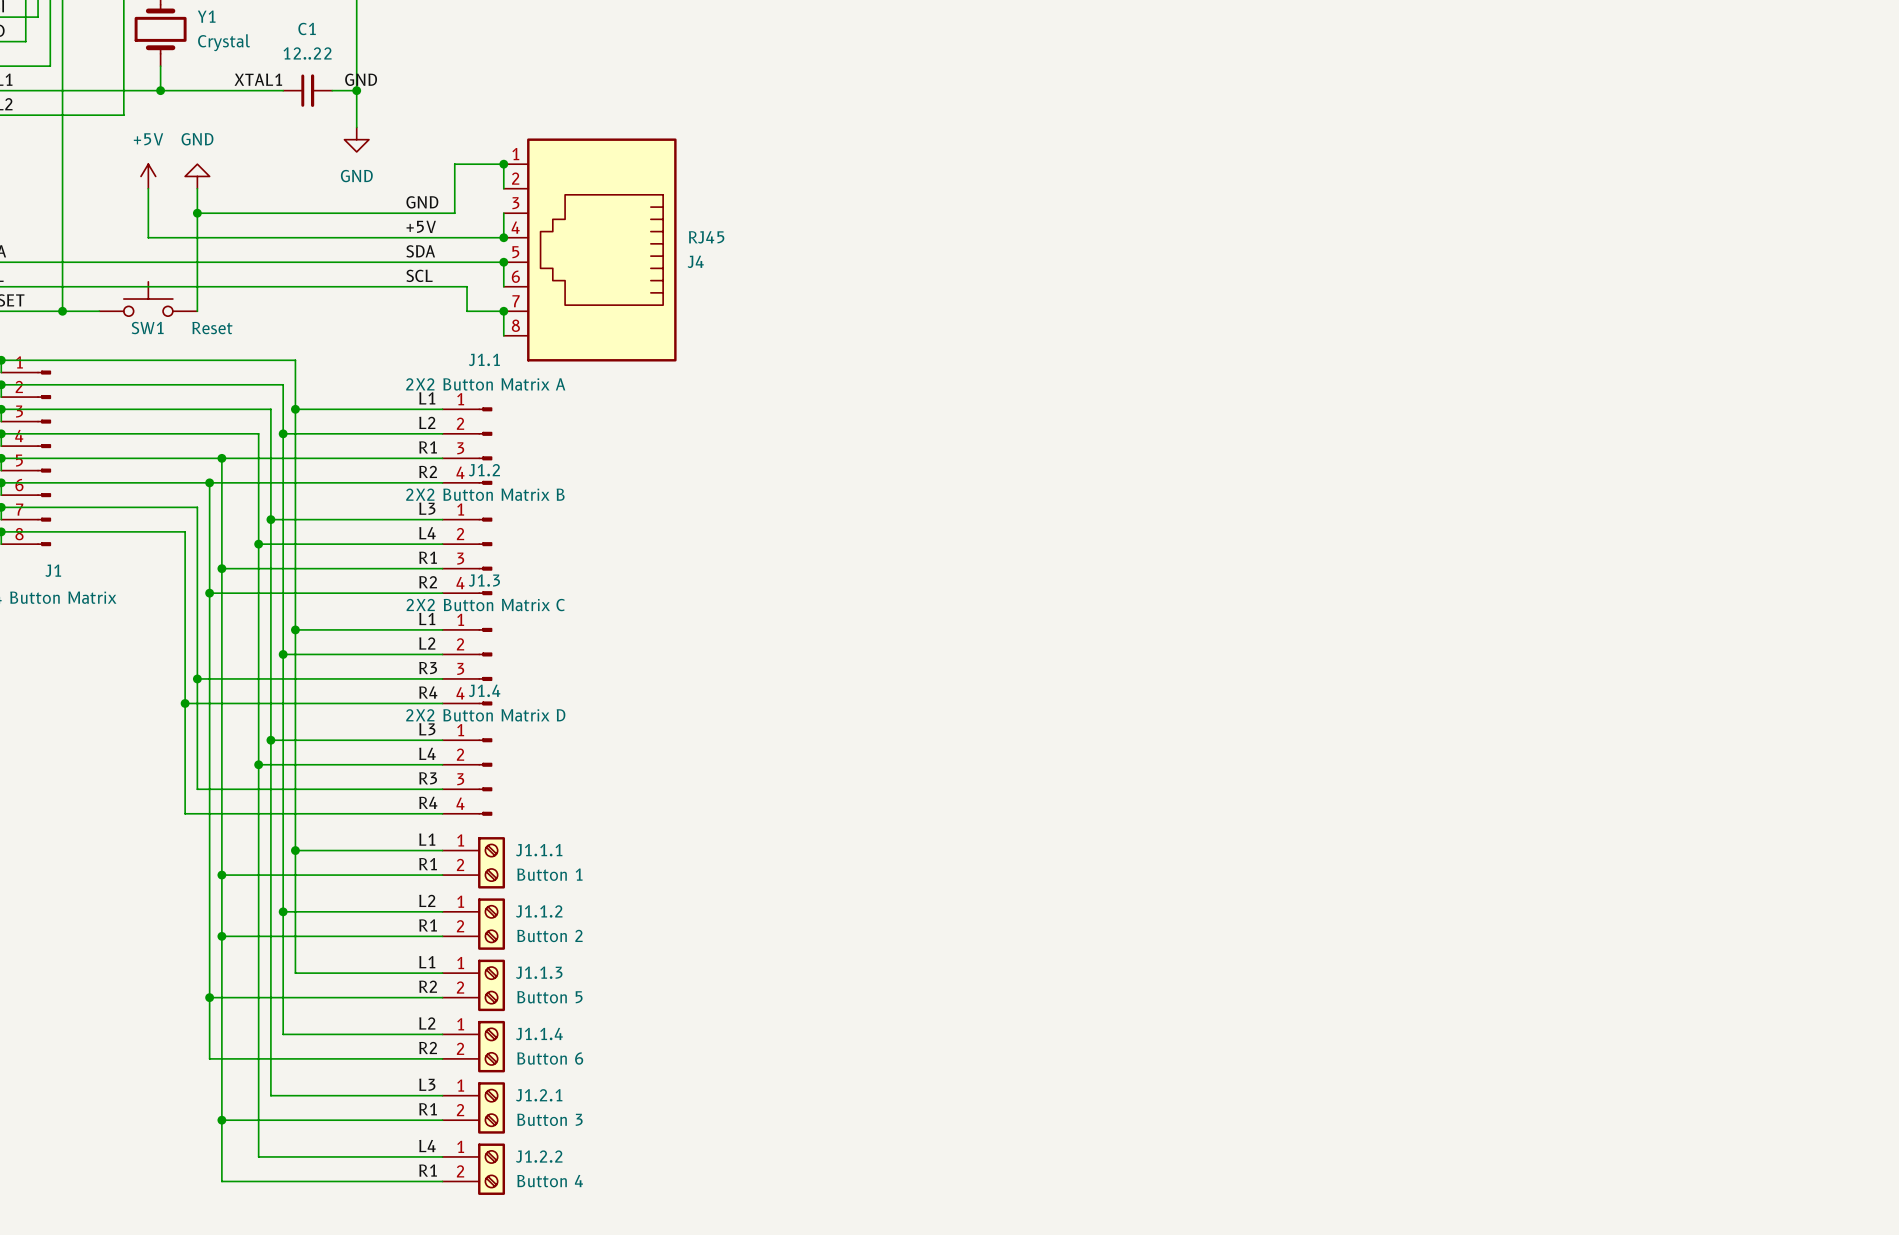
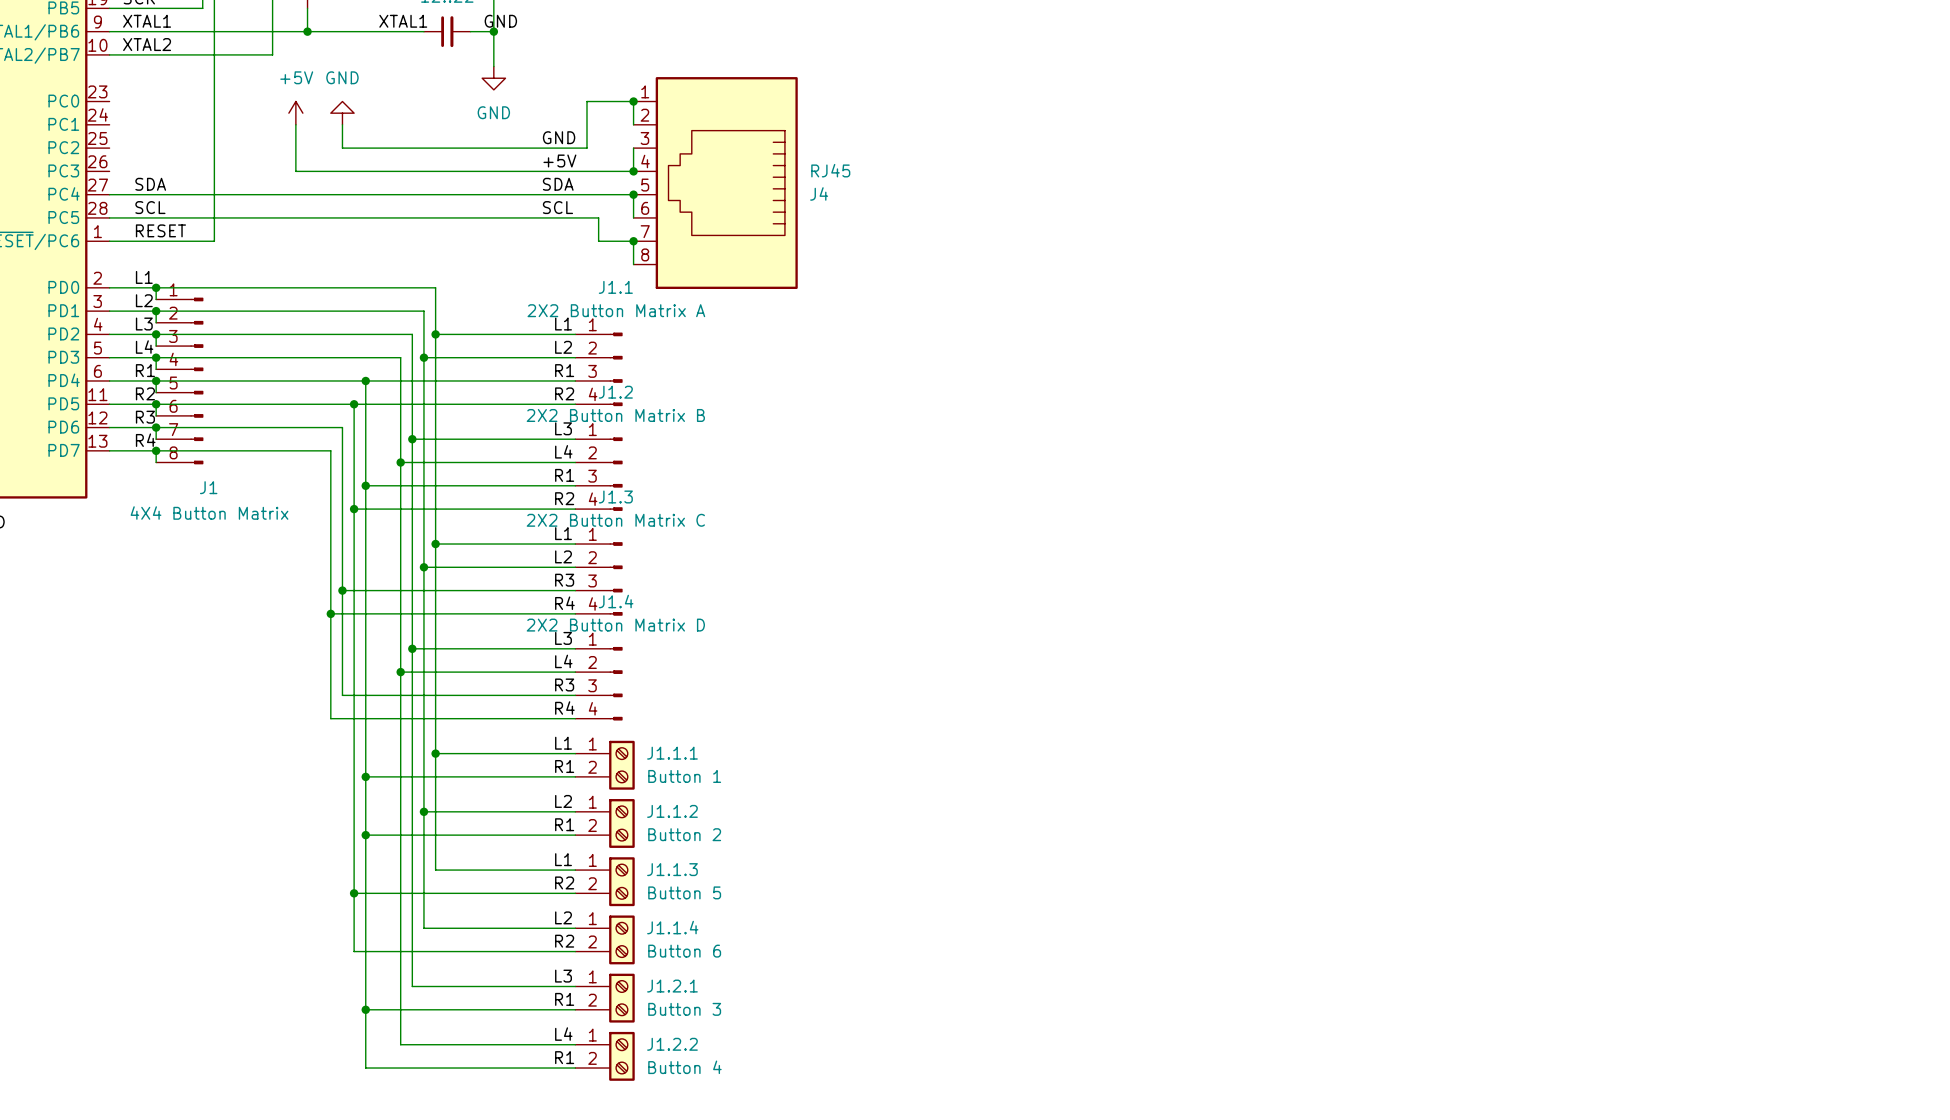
wire: (197, 213) (197, 311) -> none
junction: (197, 213) -> none
SW1: Reset (148, 299) -> none
wire: (62, 311) (99, 311) -> none
junction: (62, 311) -> none

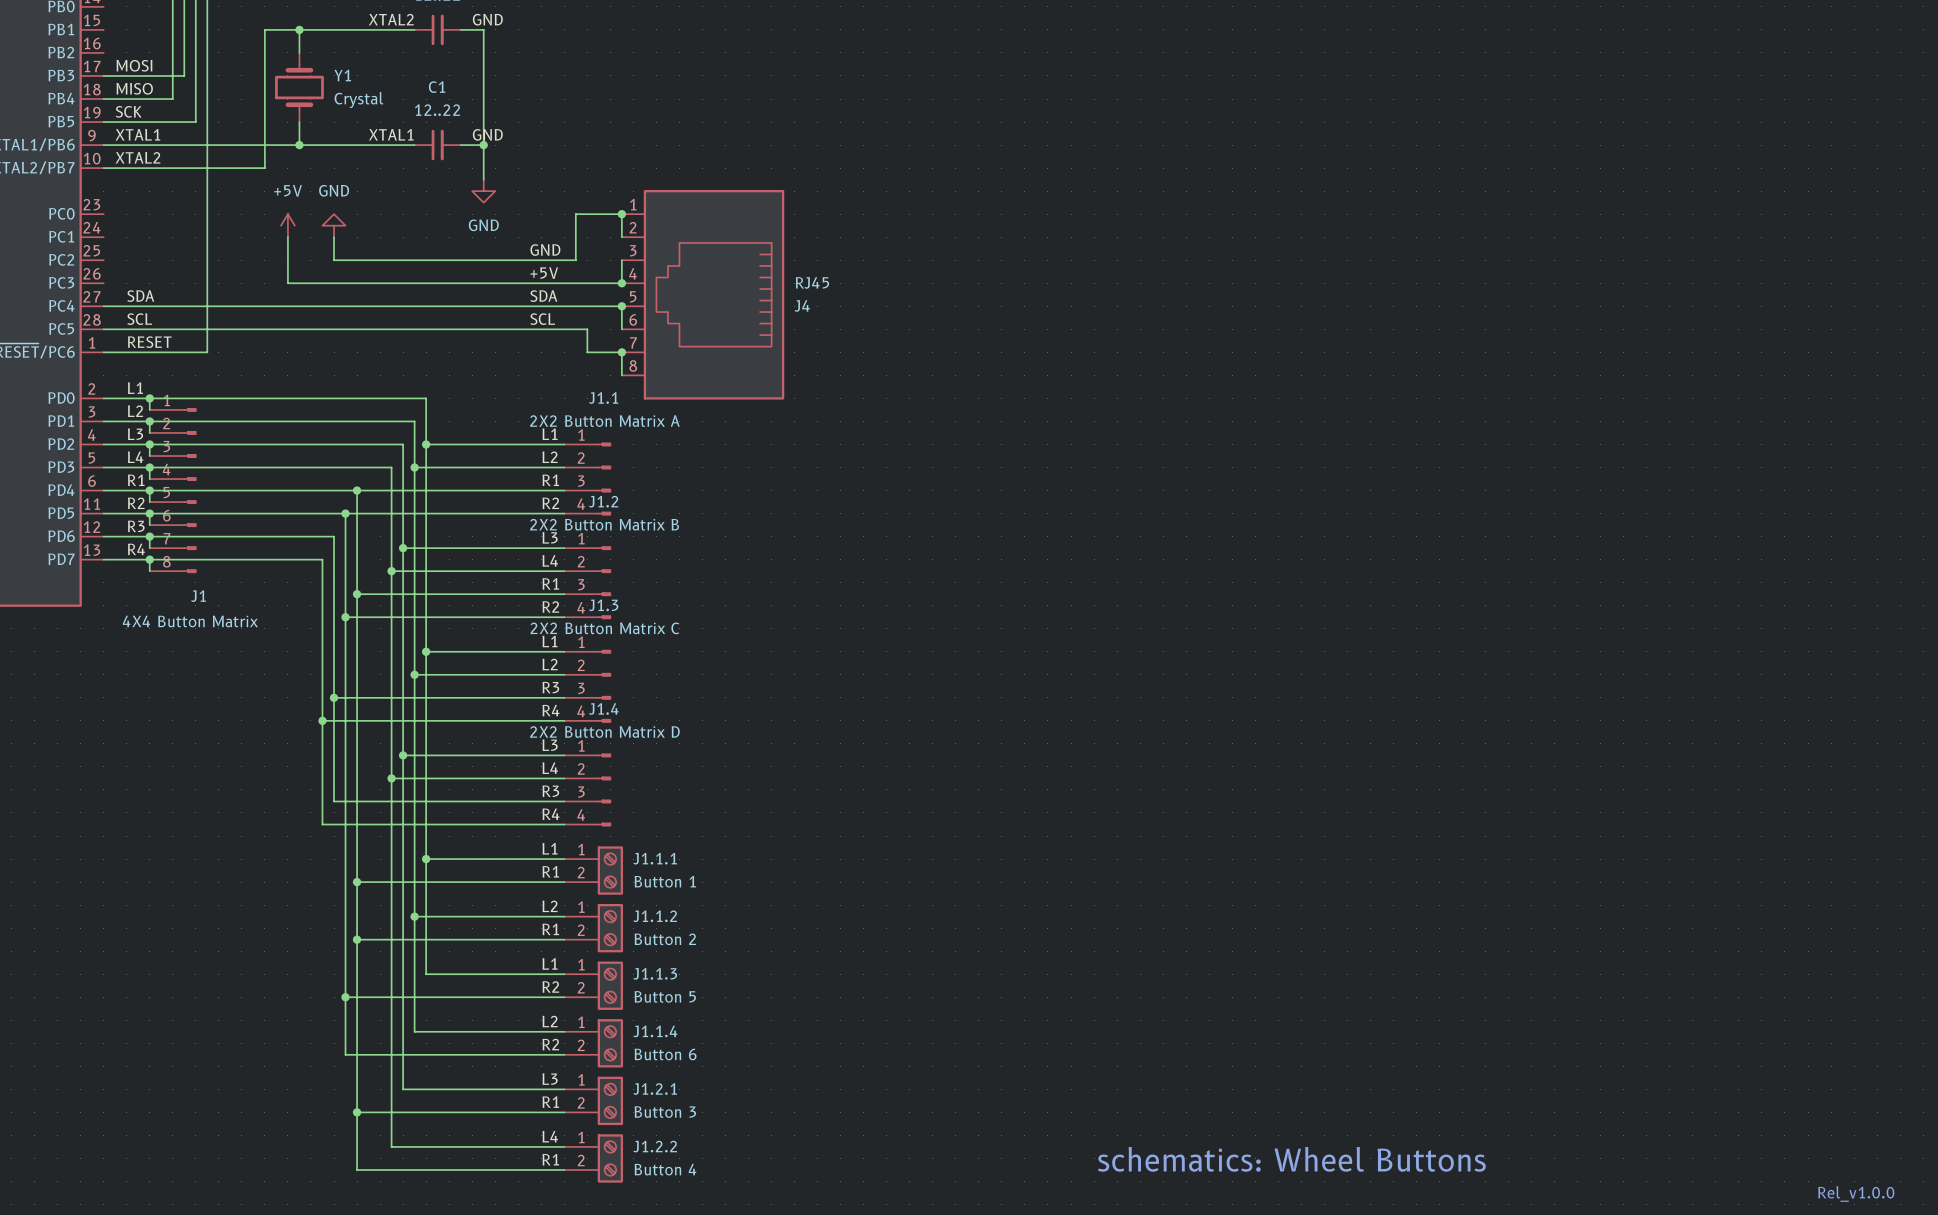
text: none -> schematics: Wheel Buttons (1291, 1159)
text: none -> Rel_v1.0.0 (1856, 1193)

